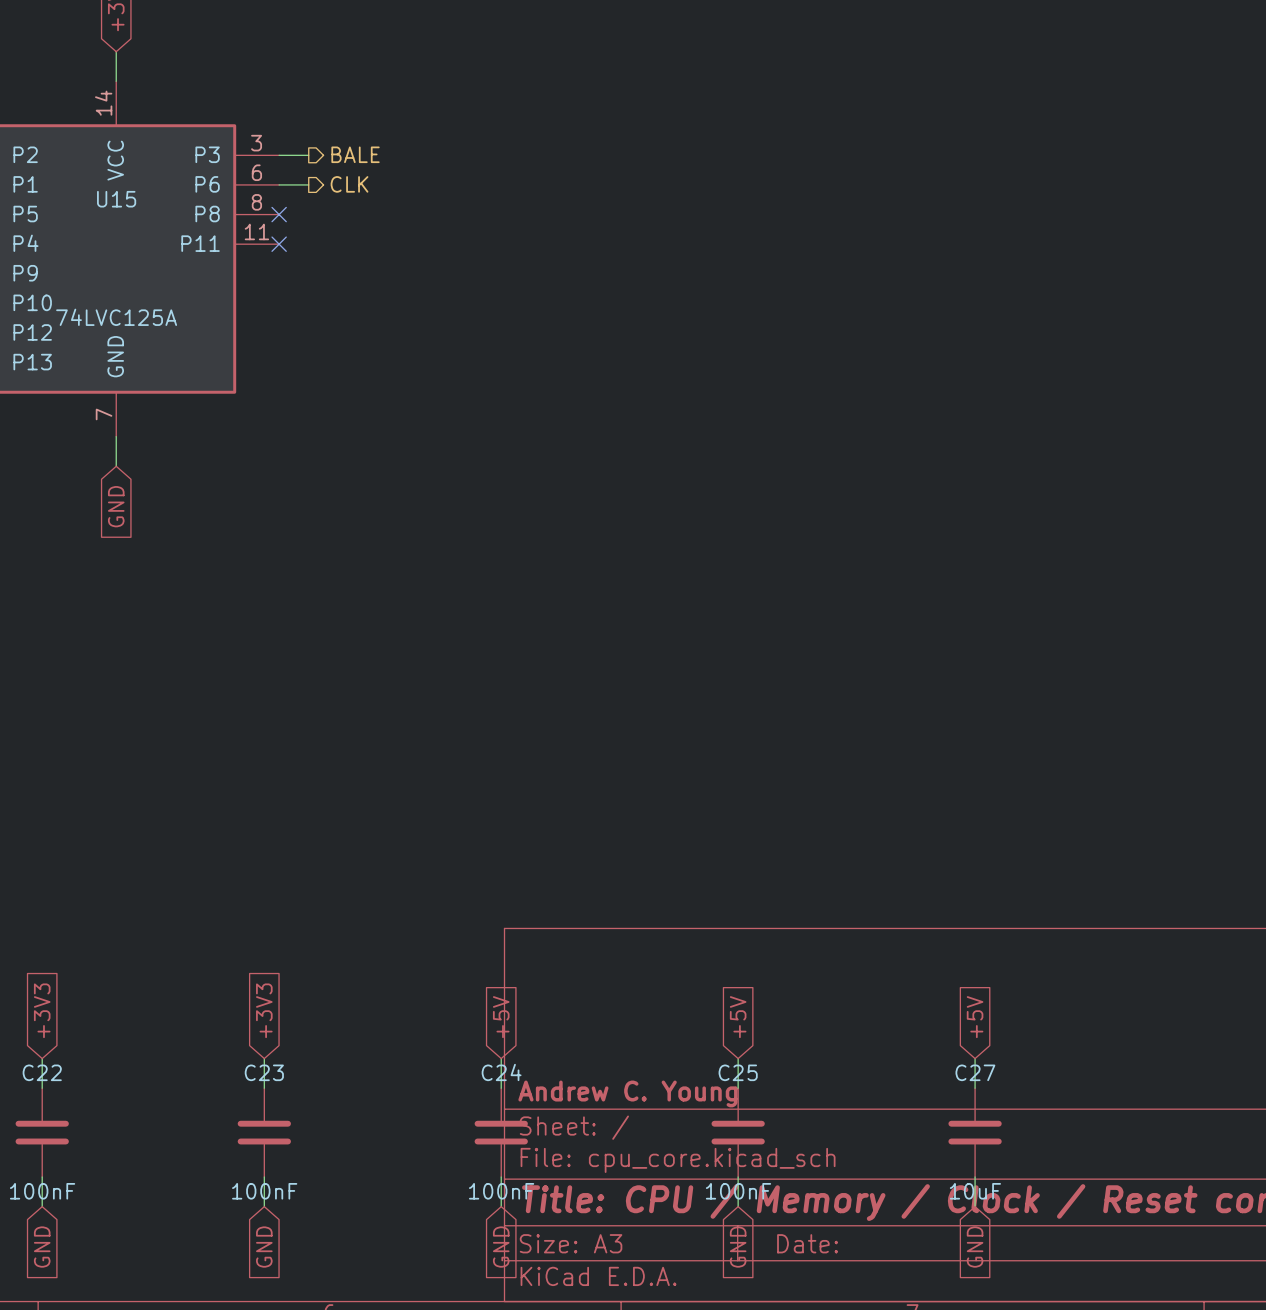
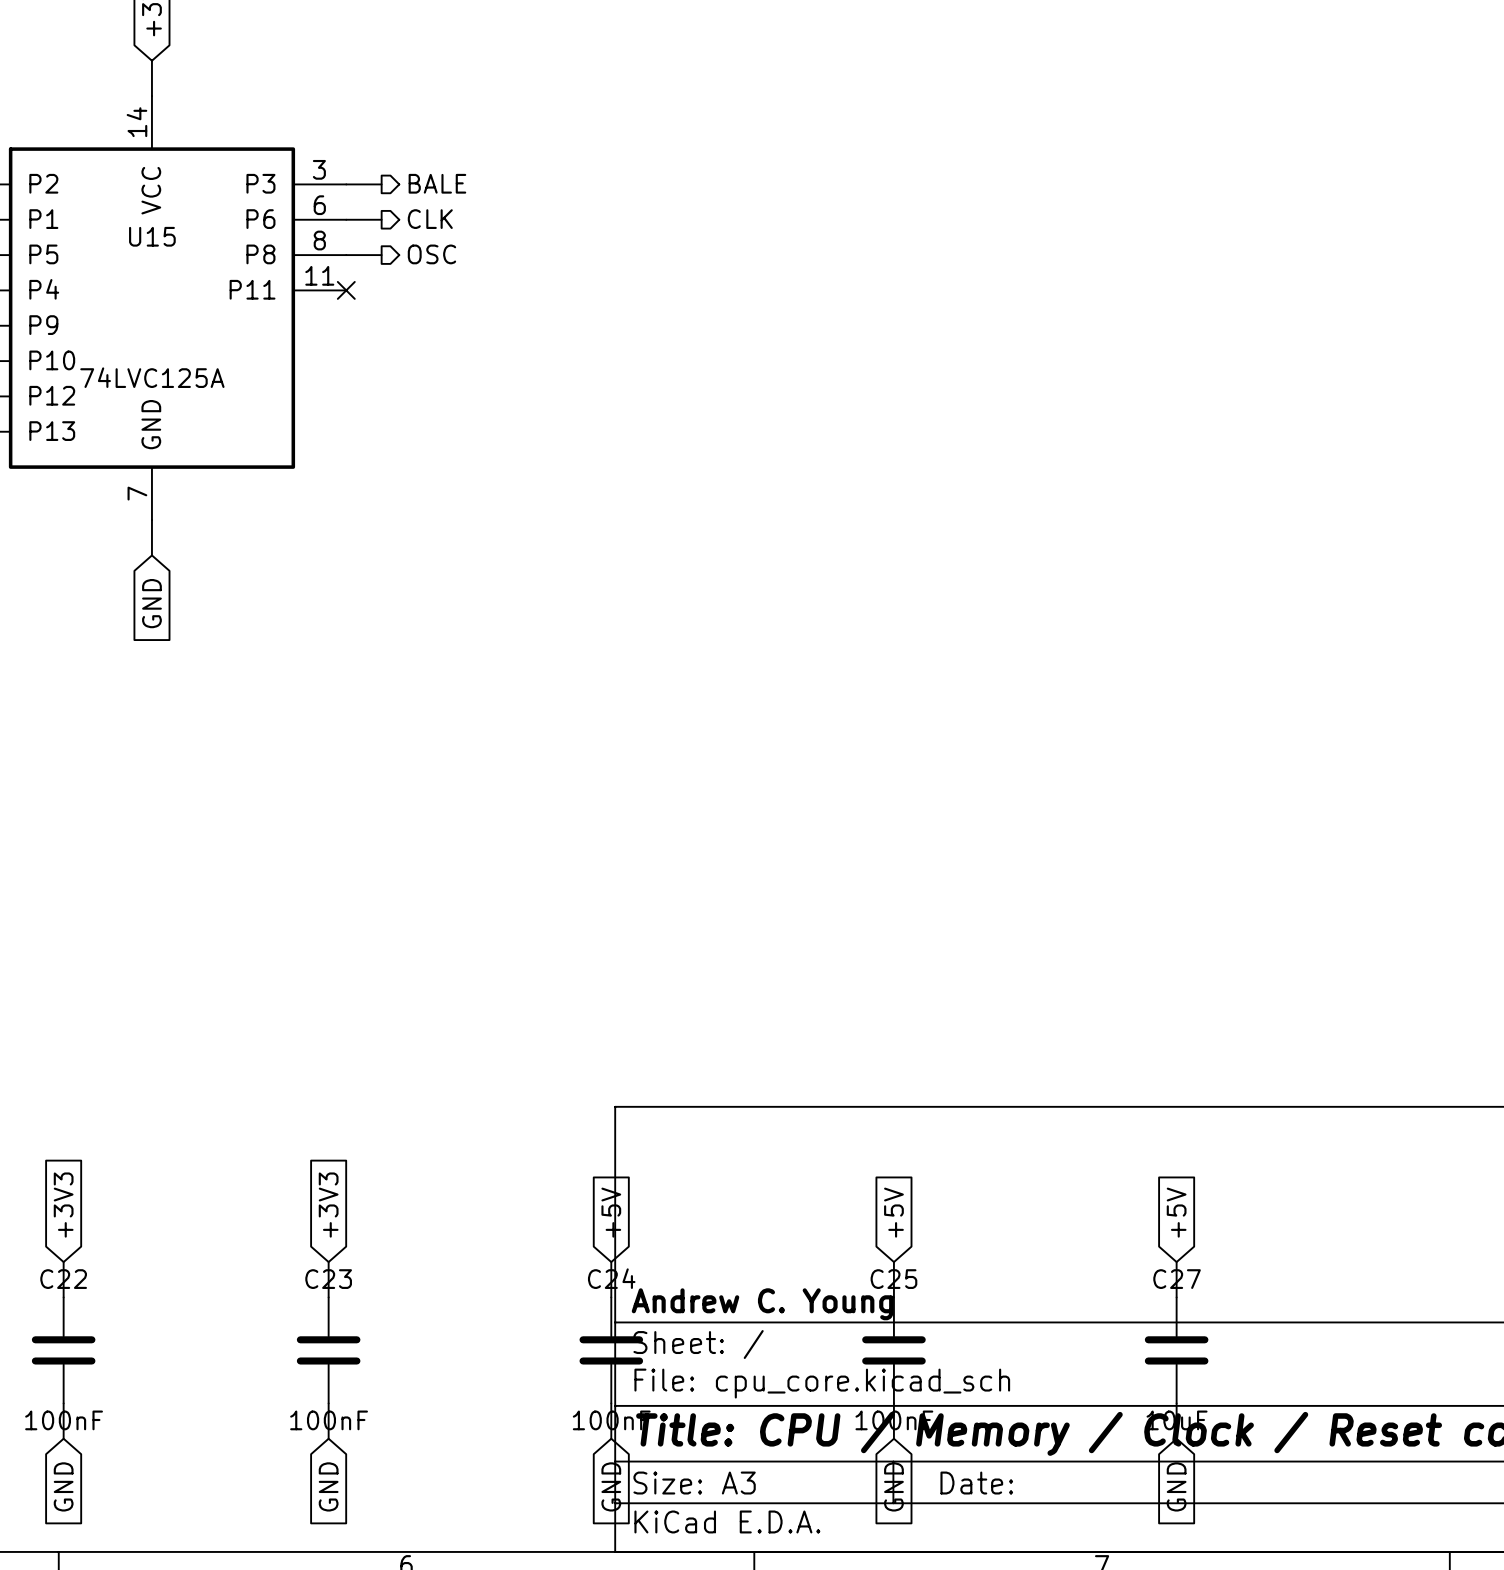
wire: none -> (346, 255) (381, 255)
no-connect mark: (279, 214) -> none
hierarchical label: none -> OSC (431, 254)

